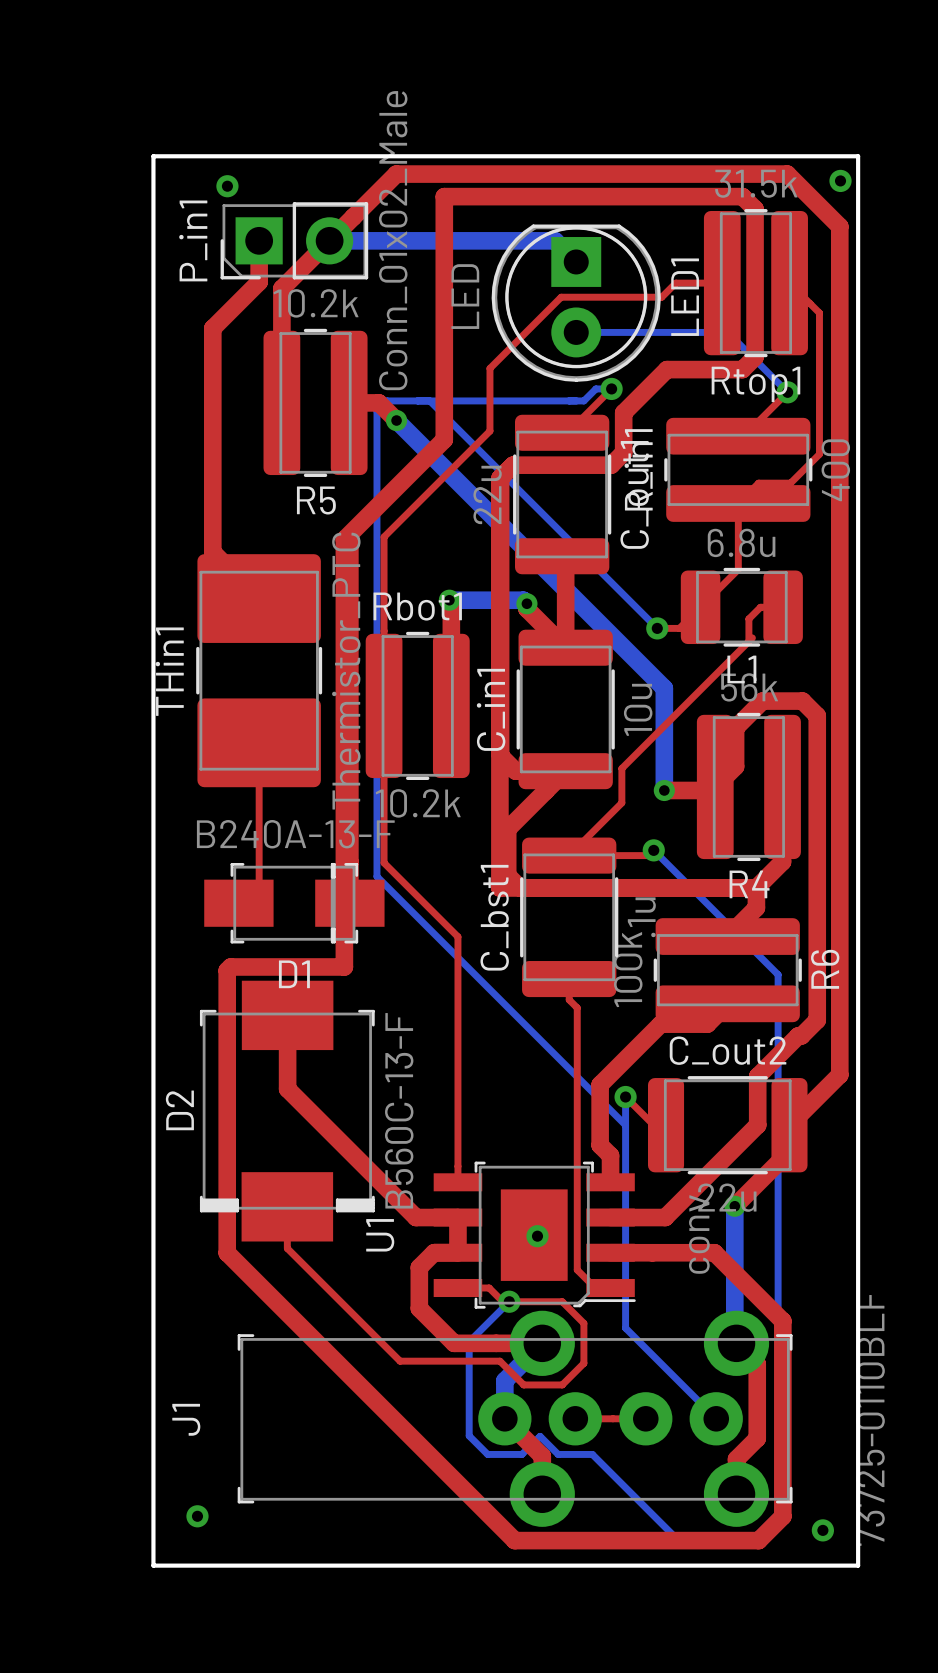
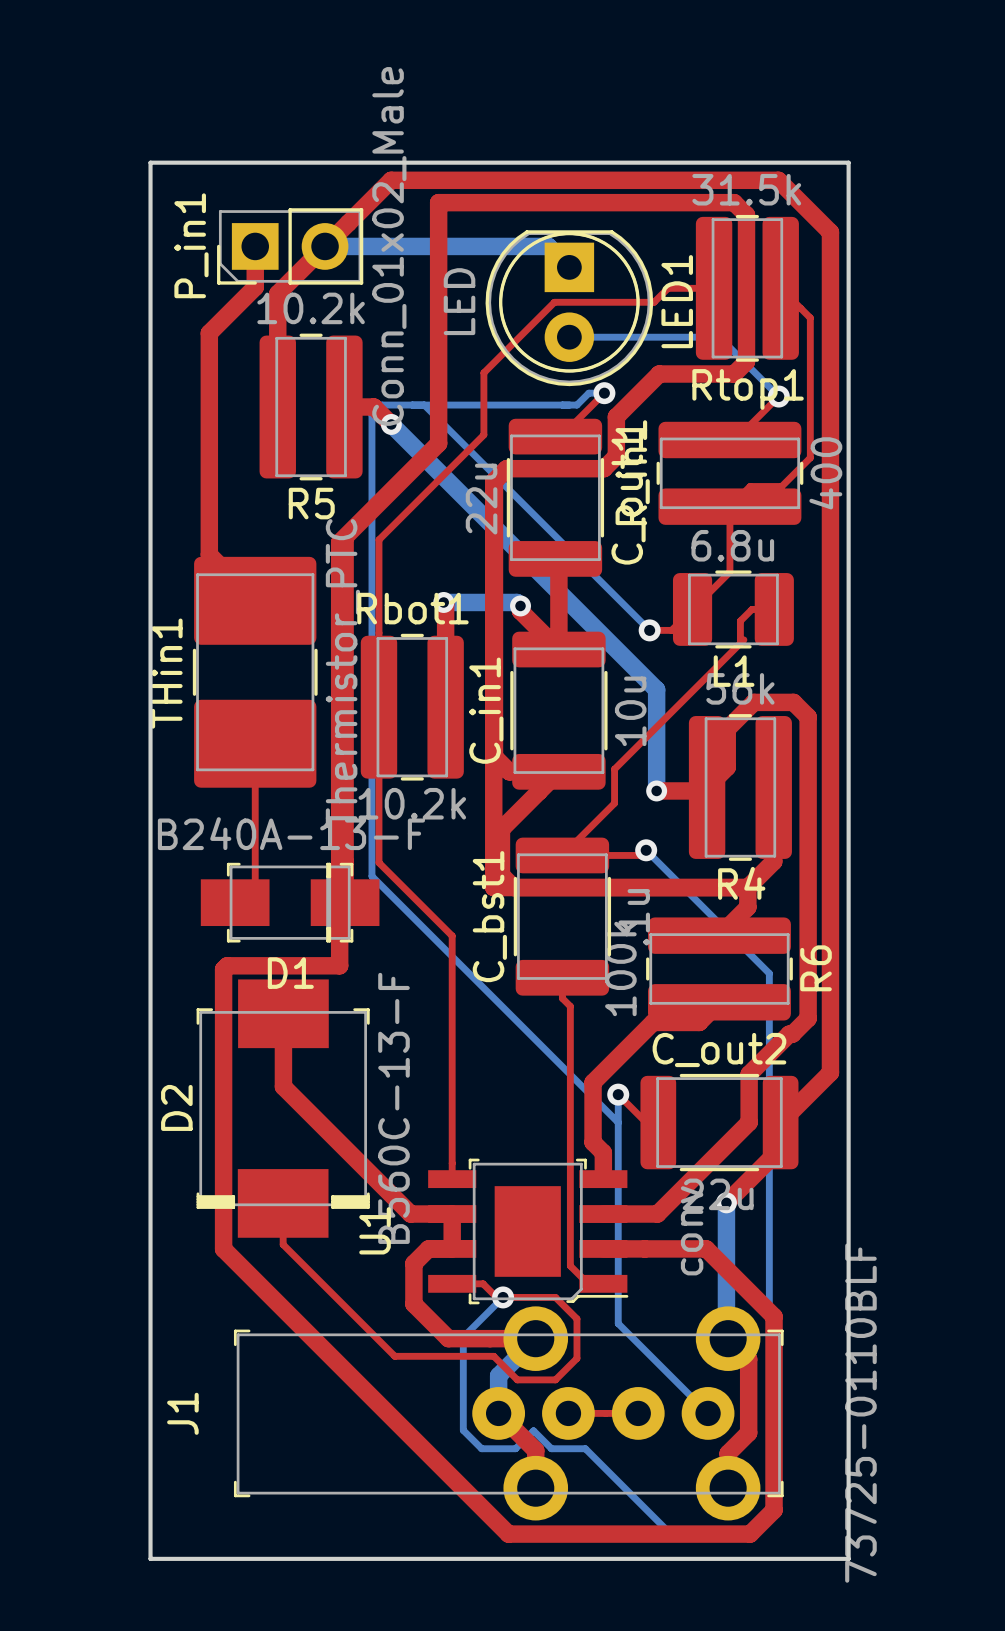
via: (840, 180) -> none
via: (227, 186) -> none
via: (537, 1236) -> none
via: (197, 1516) -> none
via: (822, 1530) -> none

